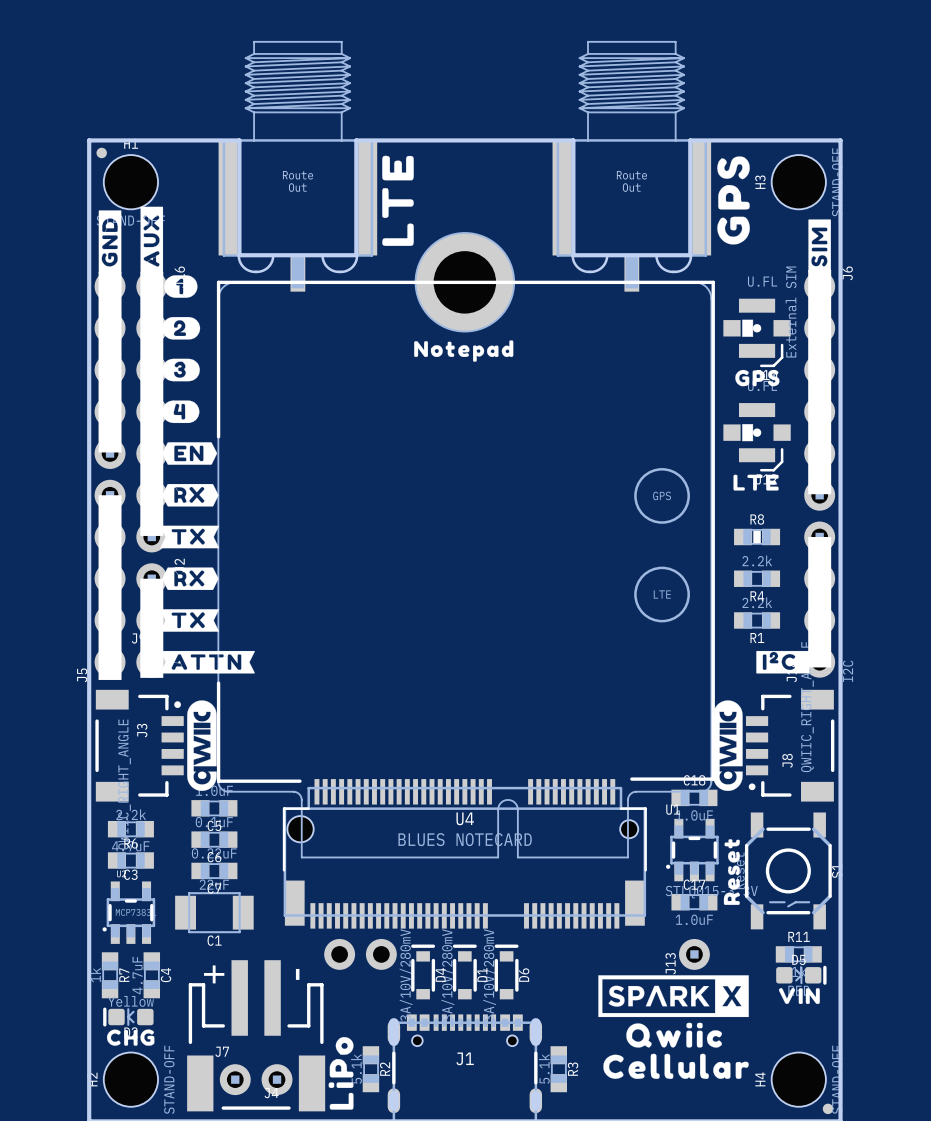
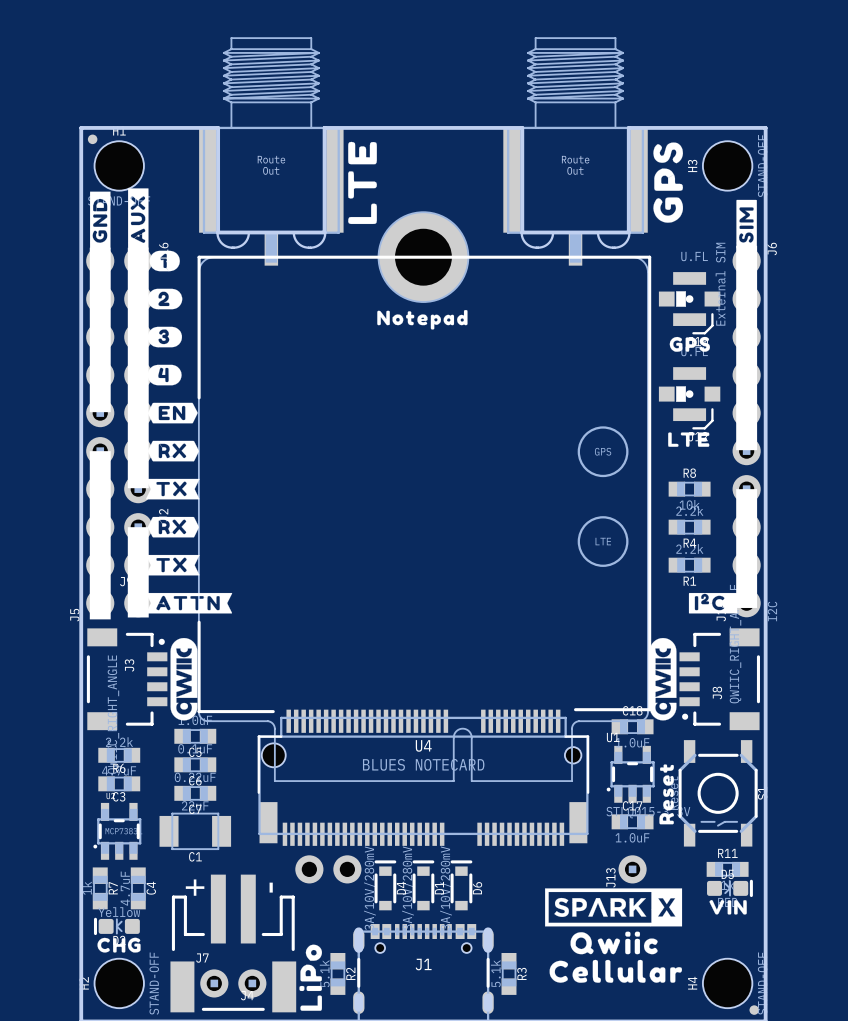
R8 footprint: [734, 528, 781, 546] -> [668, 481, 711, 497]
R8 value: none -> 10k (689, 504)

